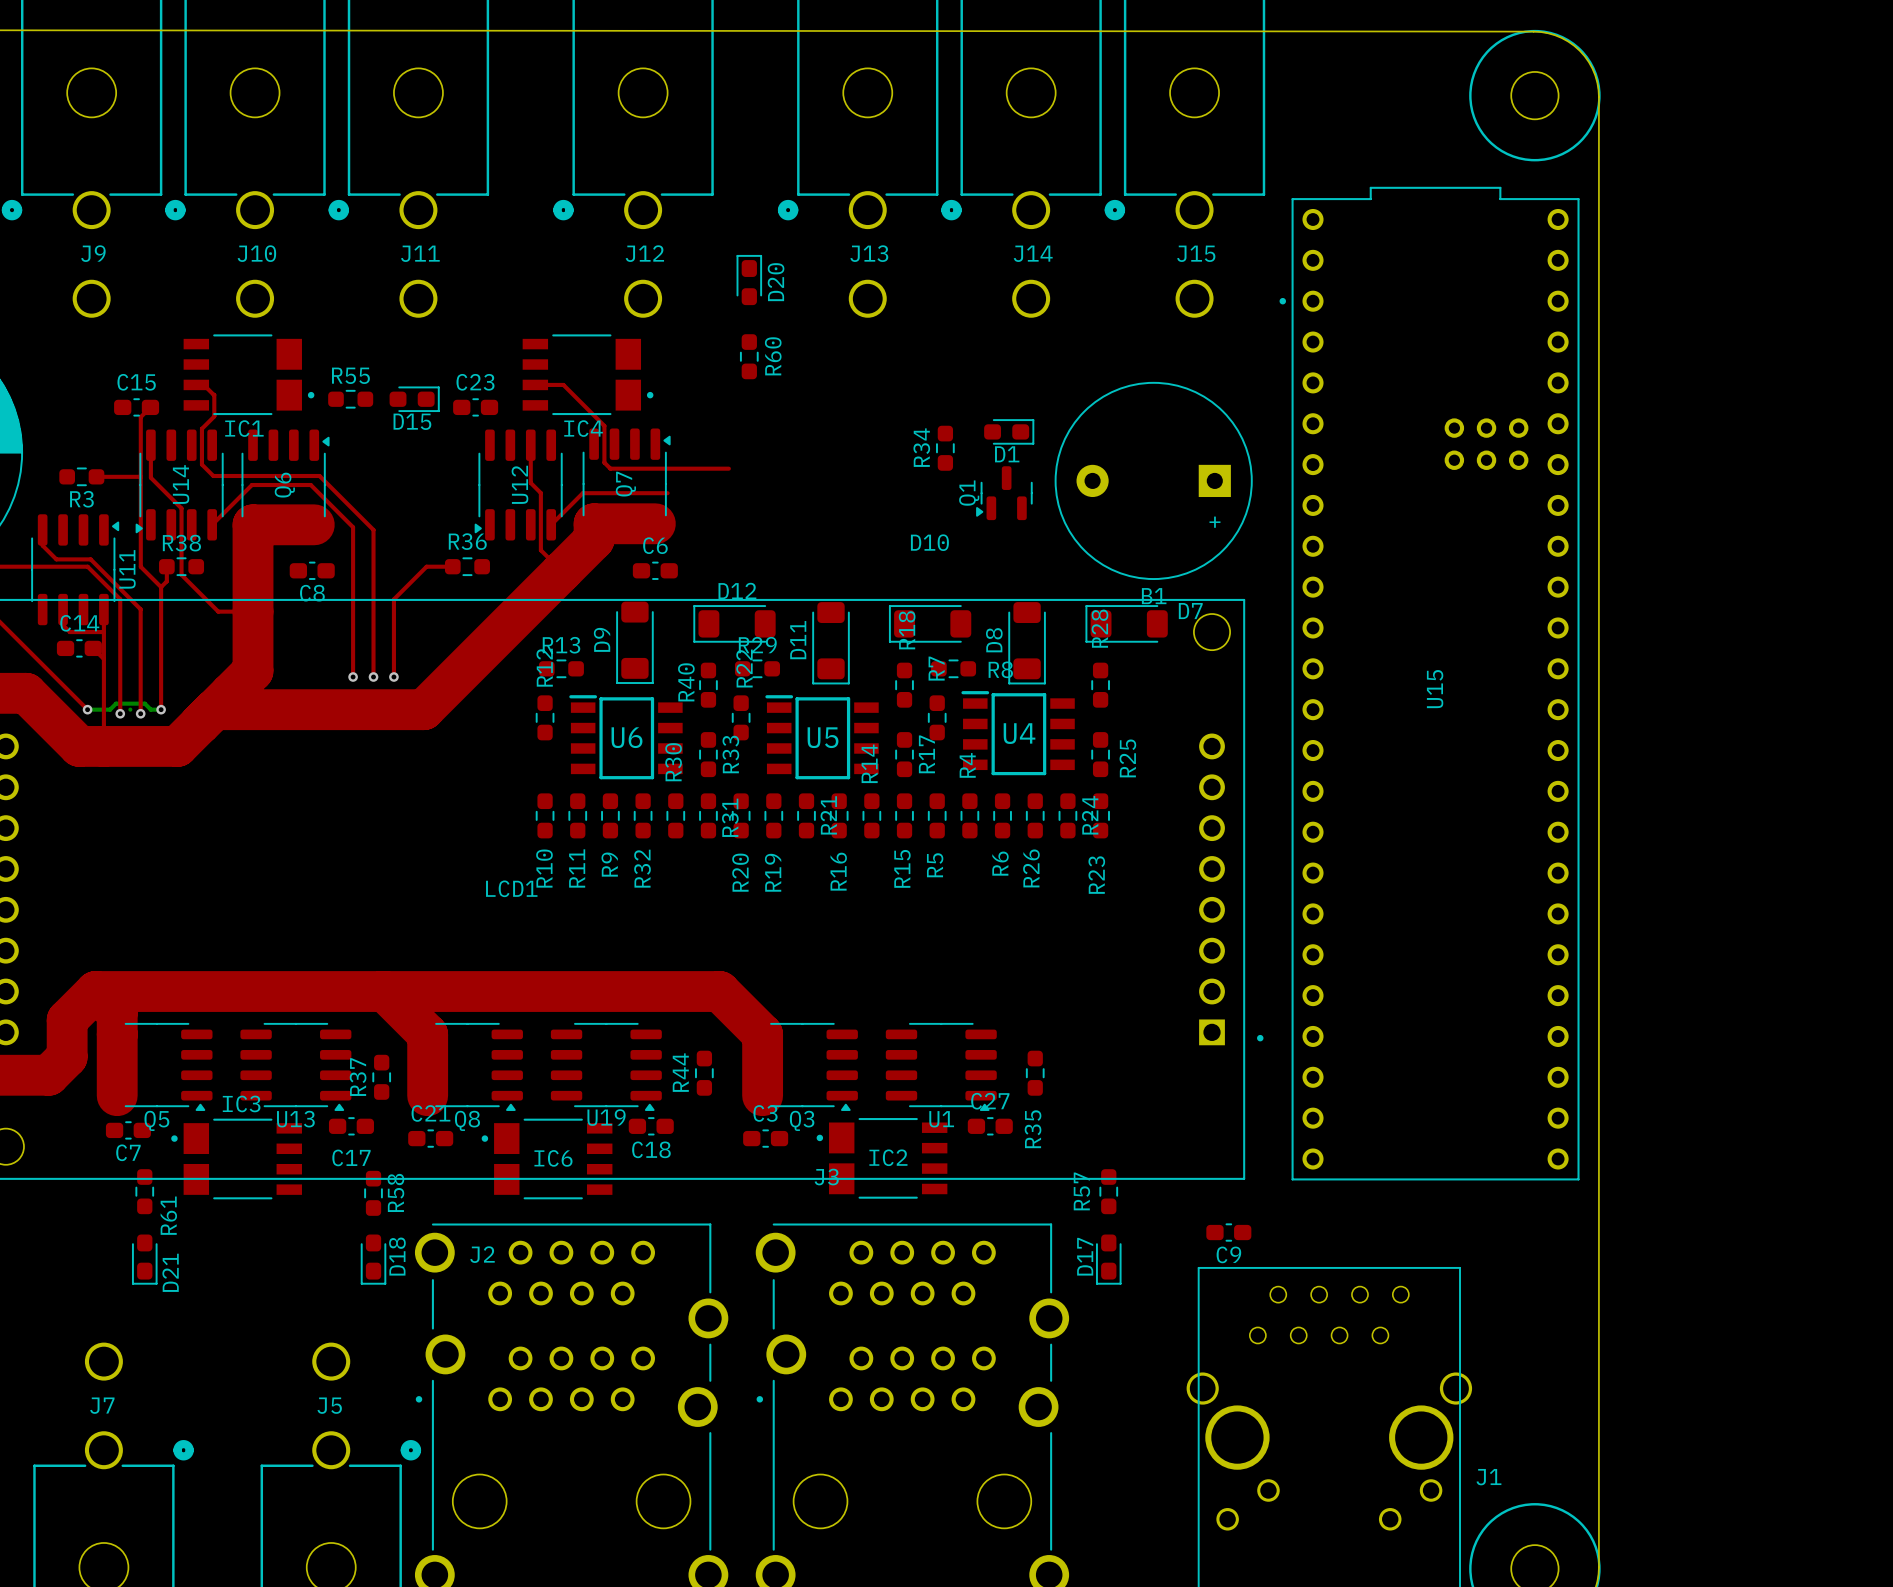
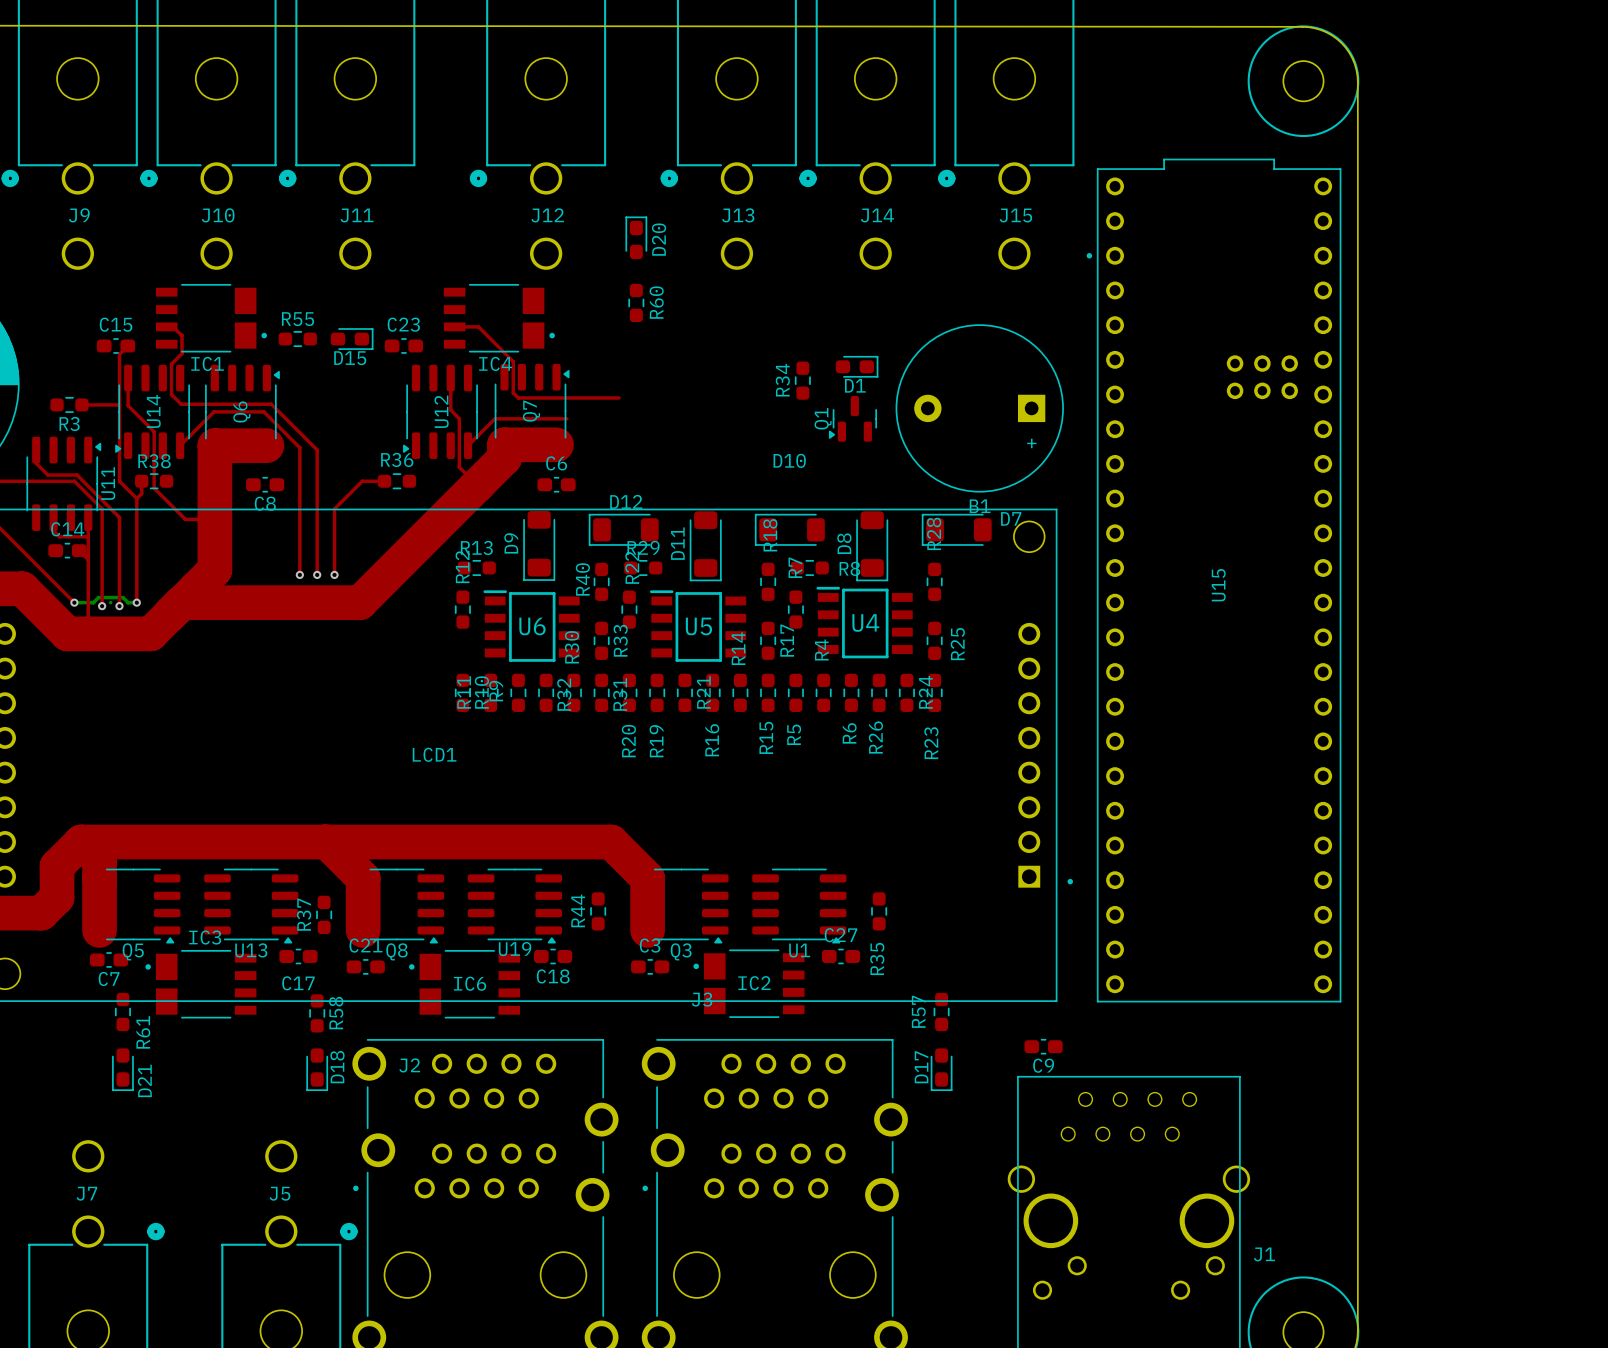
R9 name position: R9 (609, 864) -> R9 (496, 691)
R10 name position: R10 (544, 868) -> R10 (481, 692)
R11 name position: R11 (577, 868) -> R11 (464, 692)
R32 name position: R32 (642, 868) -> R32 (564, 694)

